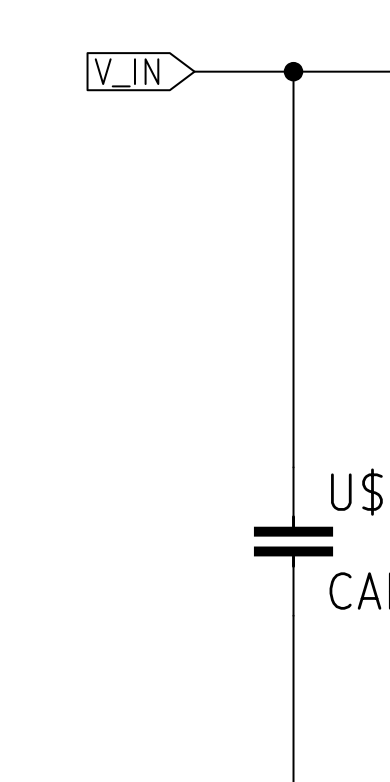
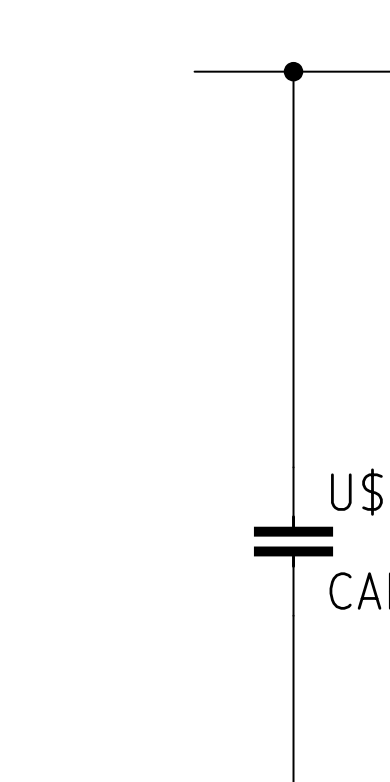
global label: V_IN (127, 72) -> none

